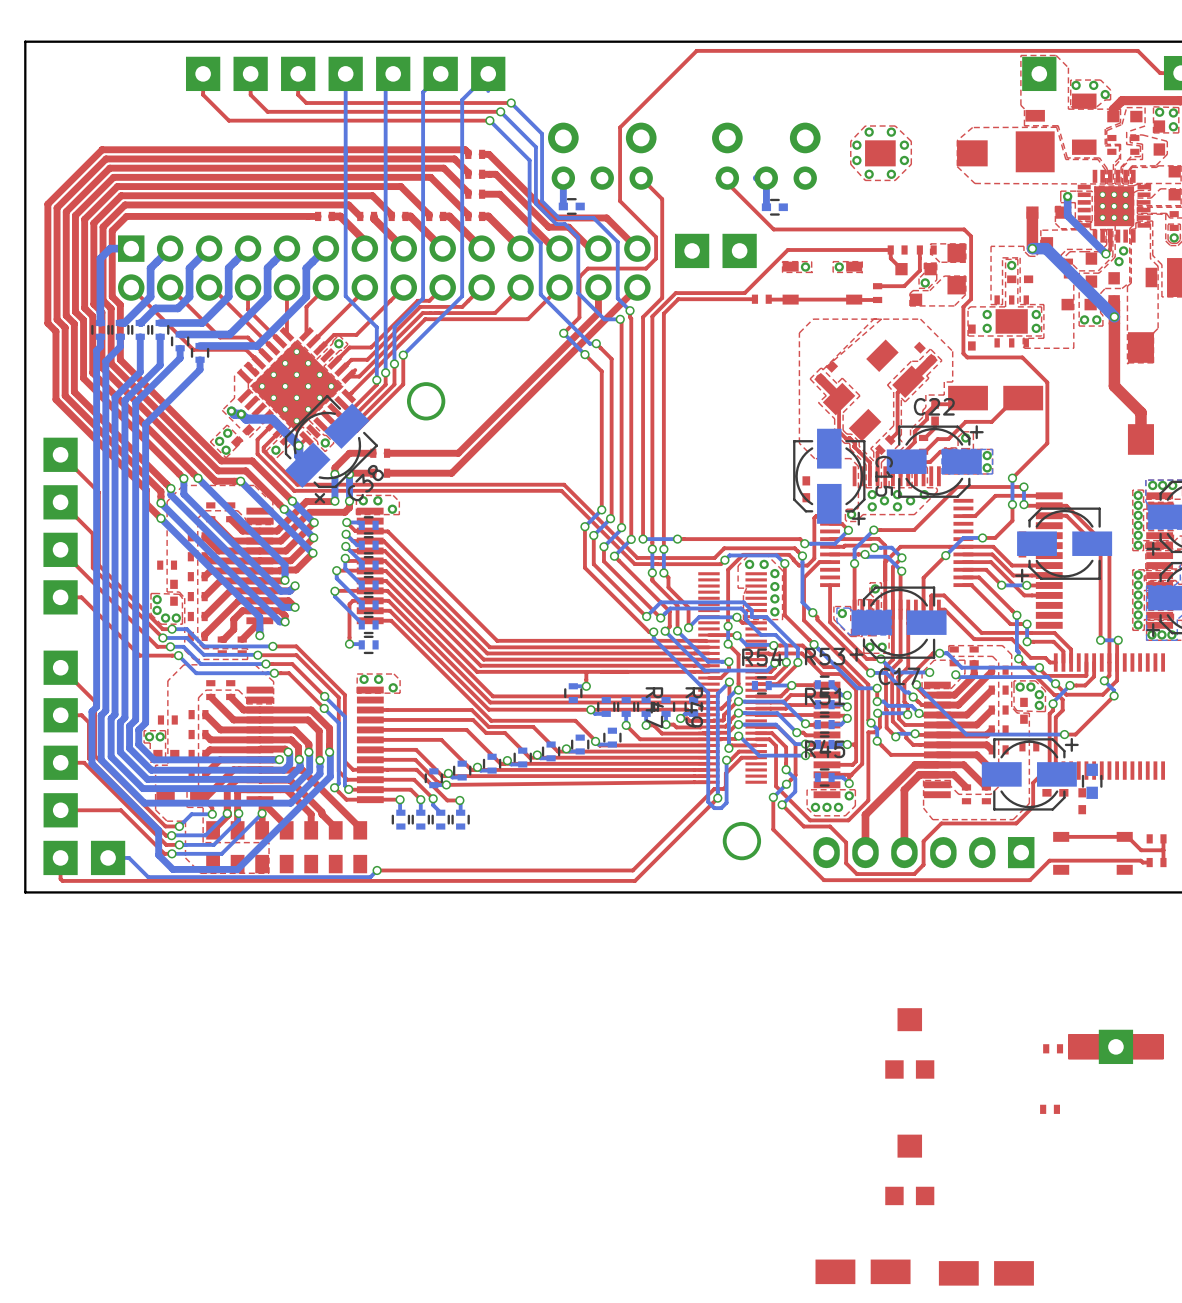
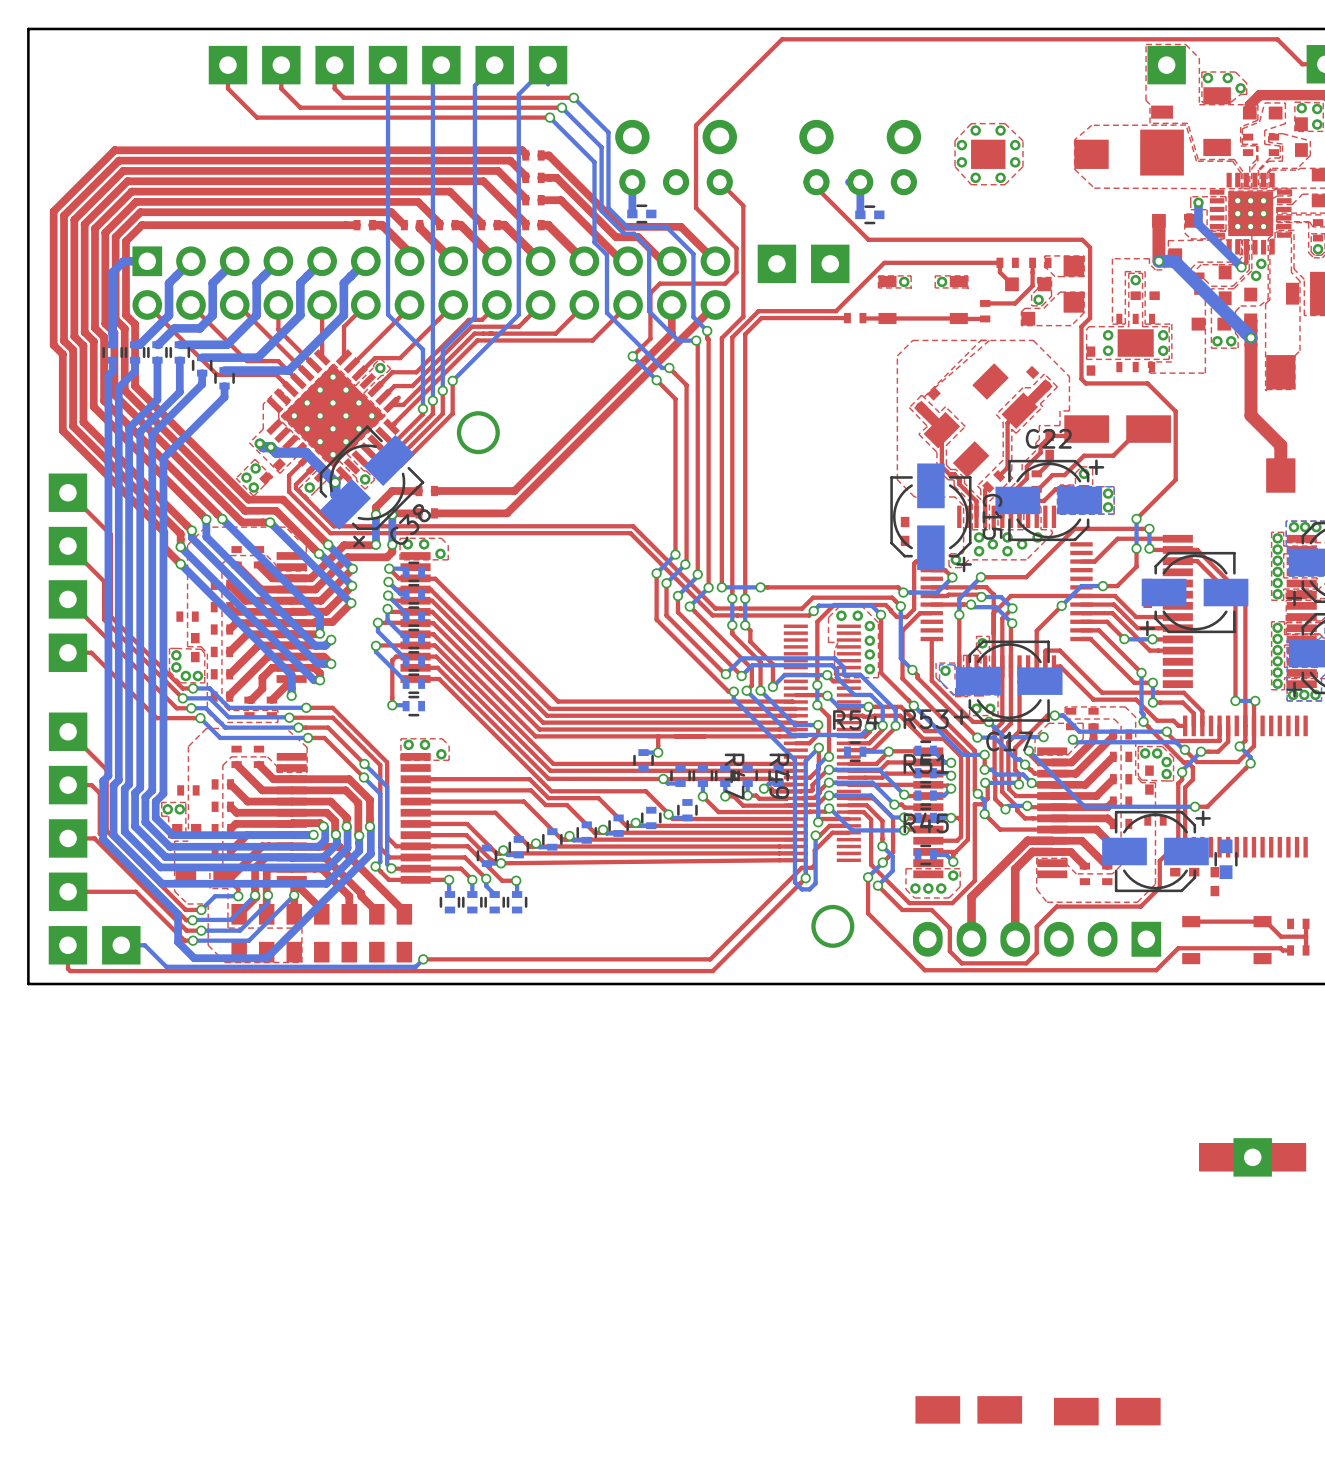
part: (909, 1043) -> none
part: (1053, 1048) -> none
part: (1050, 1109) -> none
part: (909, 1169) -> none

